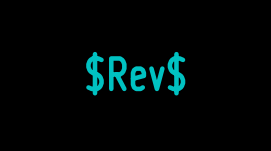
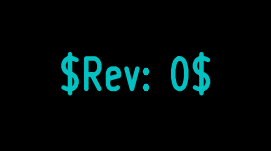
text: $Rev$ (135, 73) -> $Rev: 0$ (135, 73)

